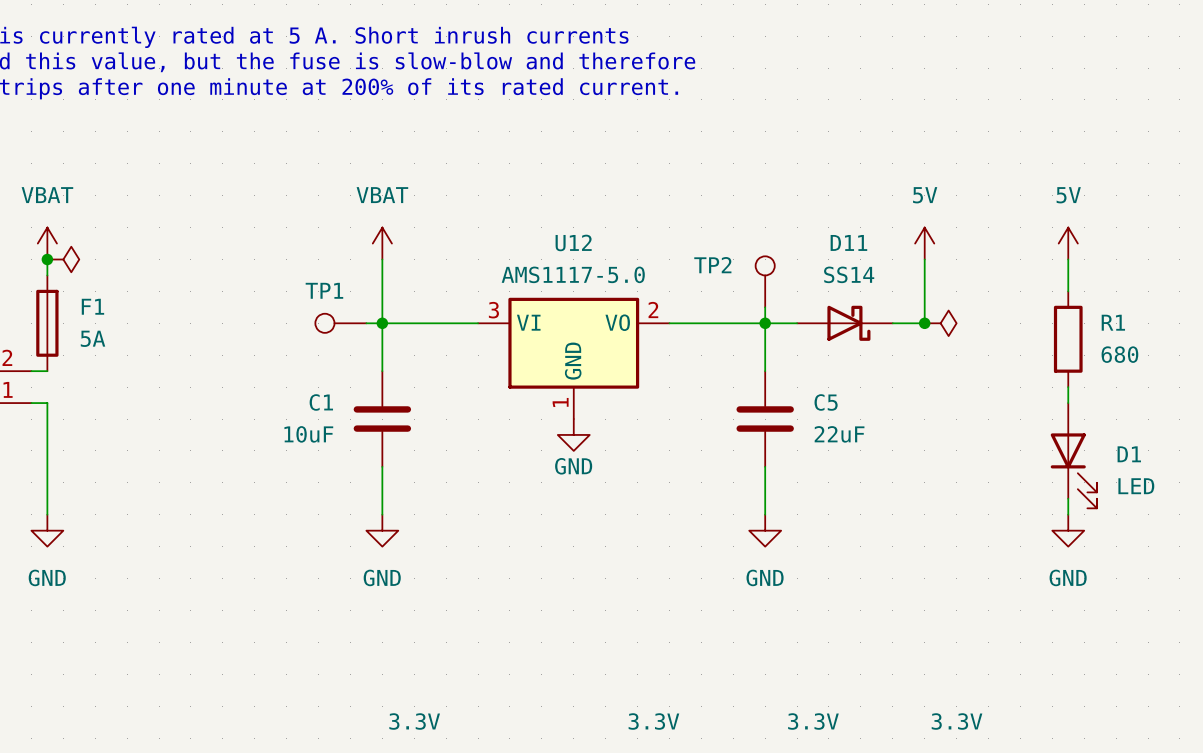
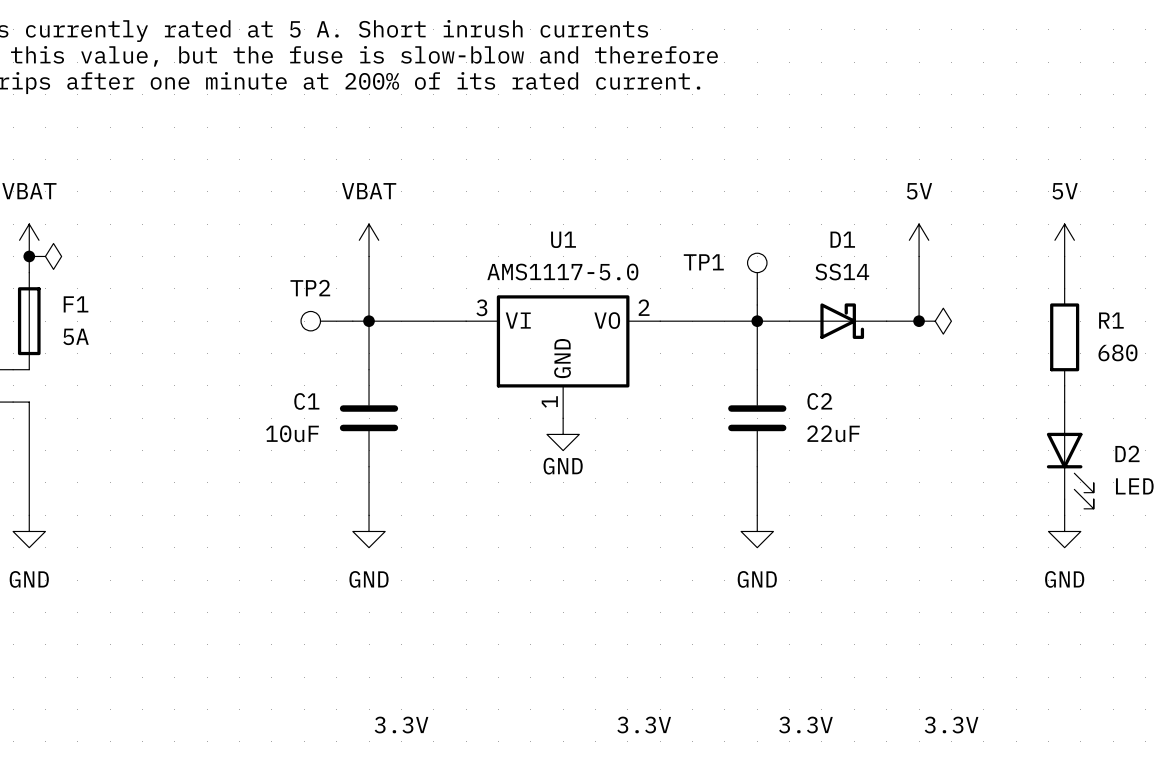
U12 name: U12 (573, 242) -> U1 (563, 239)
D11 name: D11 (848, 242) -> D1 (842, 239)
TP2 name: TP2 (712, 265) -> TP1 (703, 262)
TP1 name: TP1 (324, 290) -> TP2 (310, 288)
C5 name: C5 (826, 402) -> C2 (819, 401)
D1 name: D1 (1129, 454) -> D2 (1127, 453)

